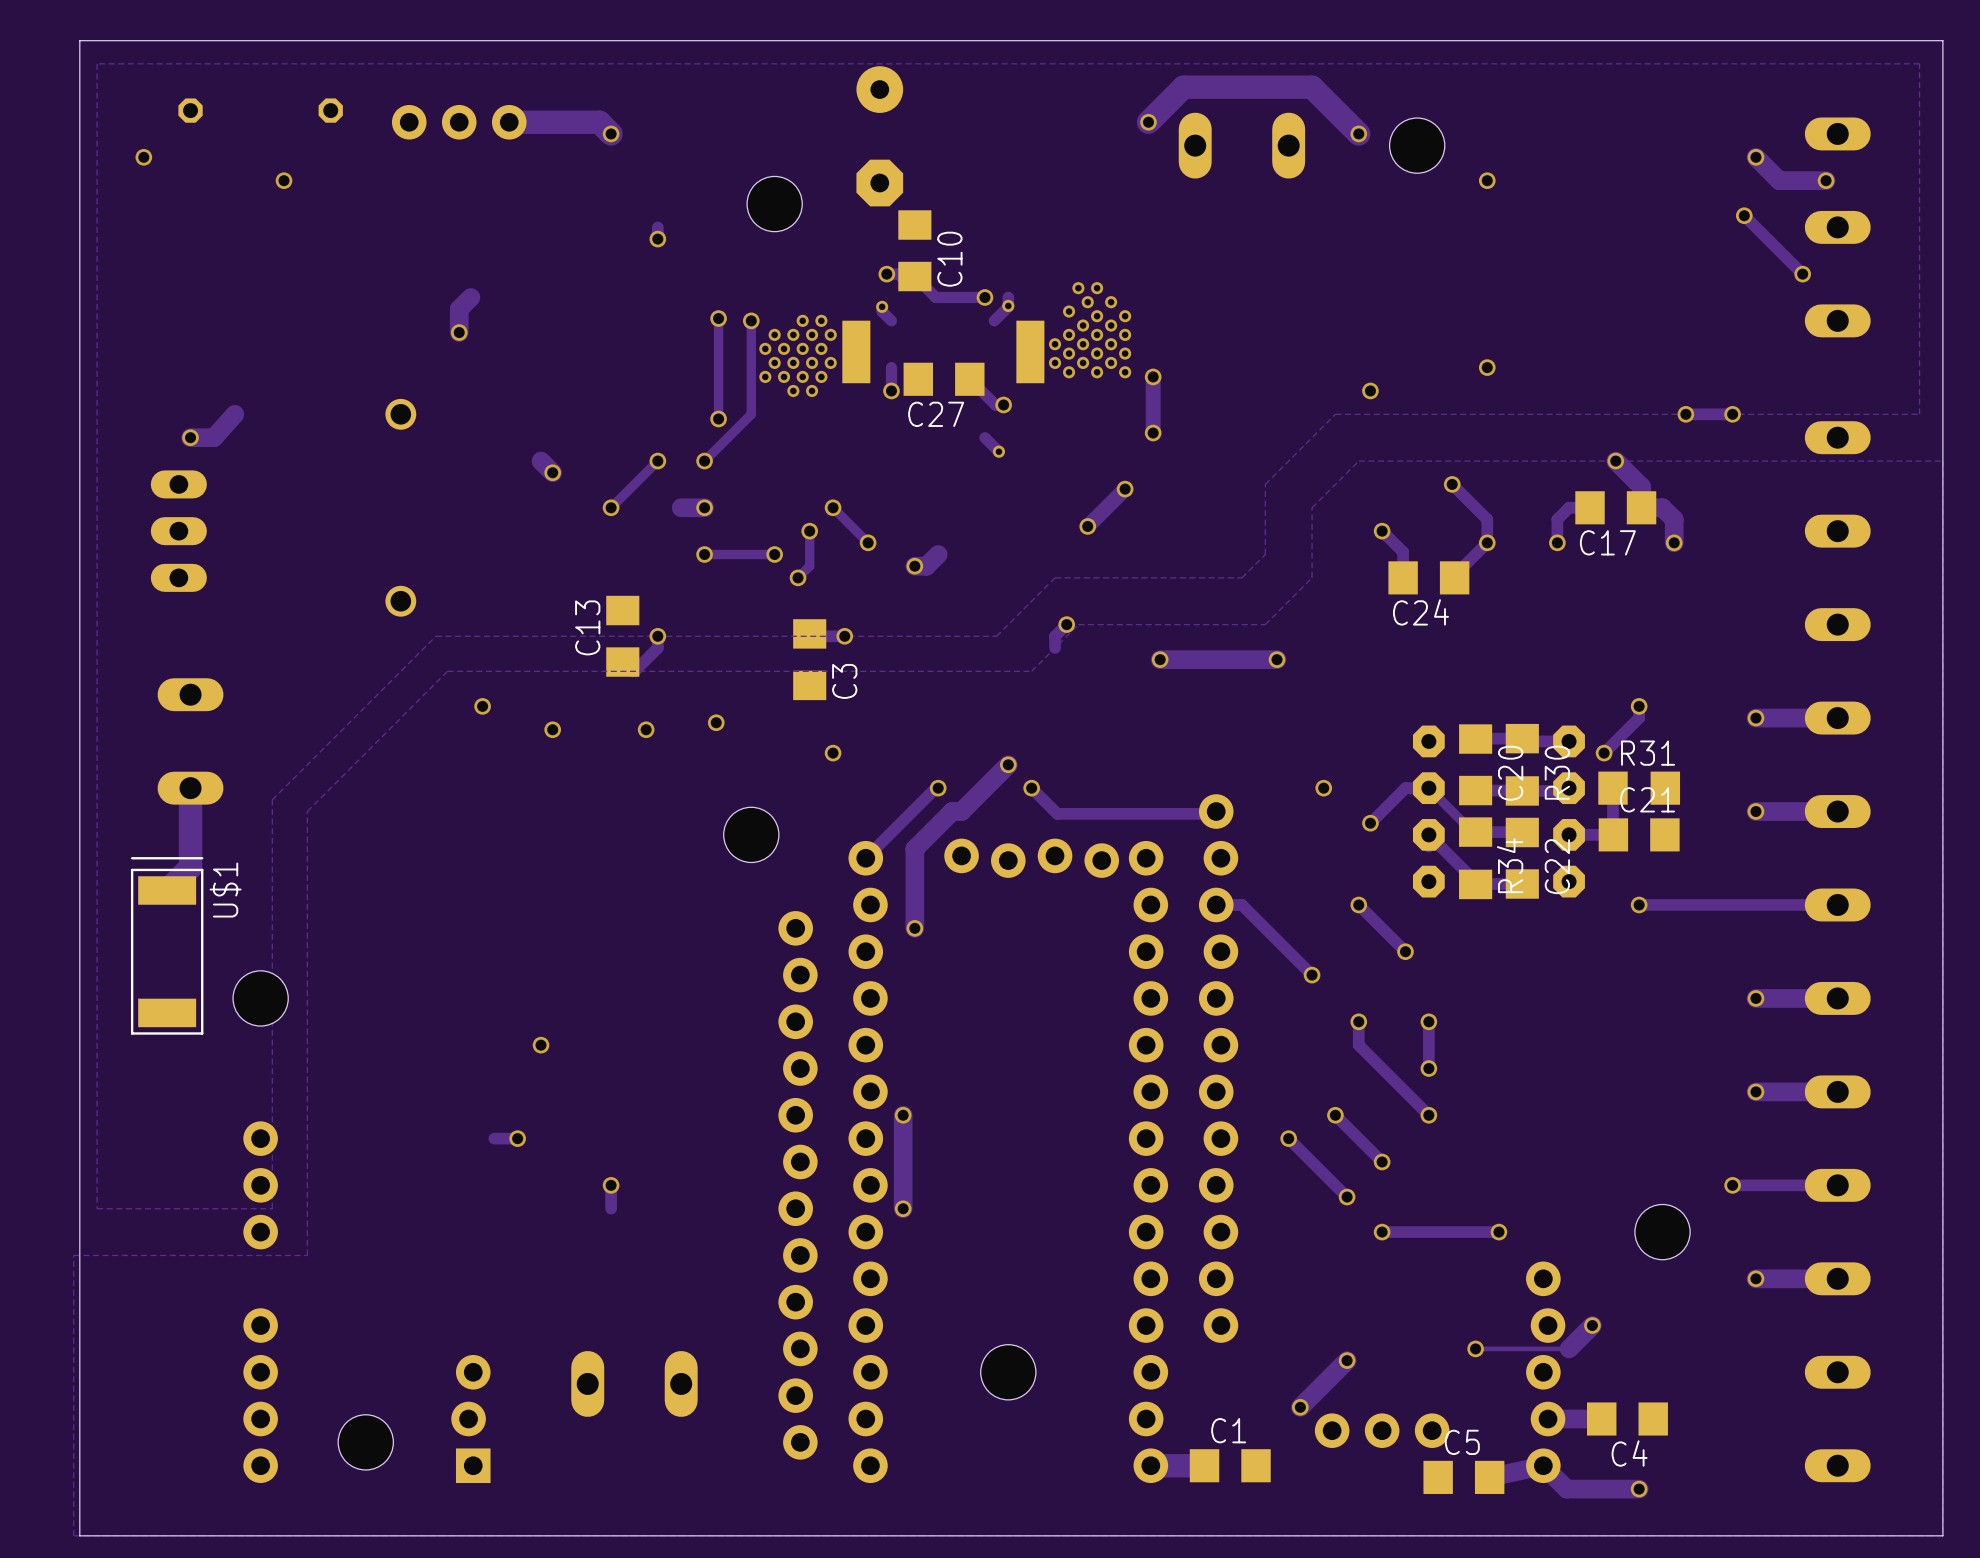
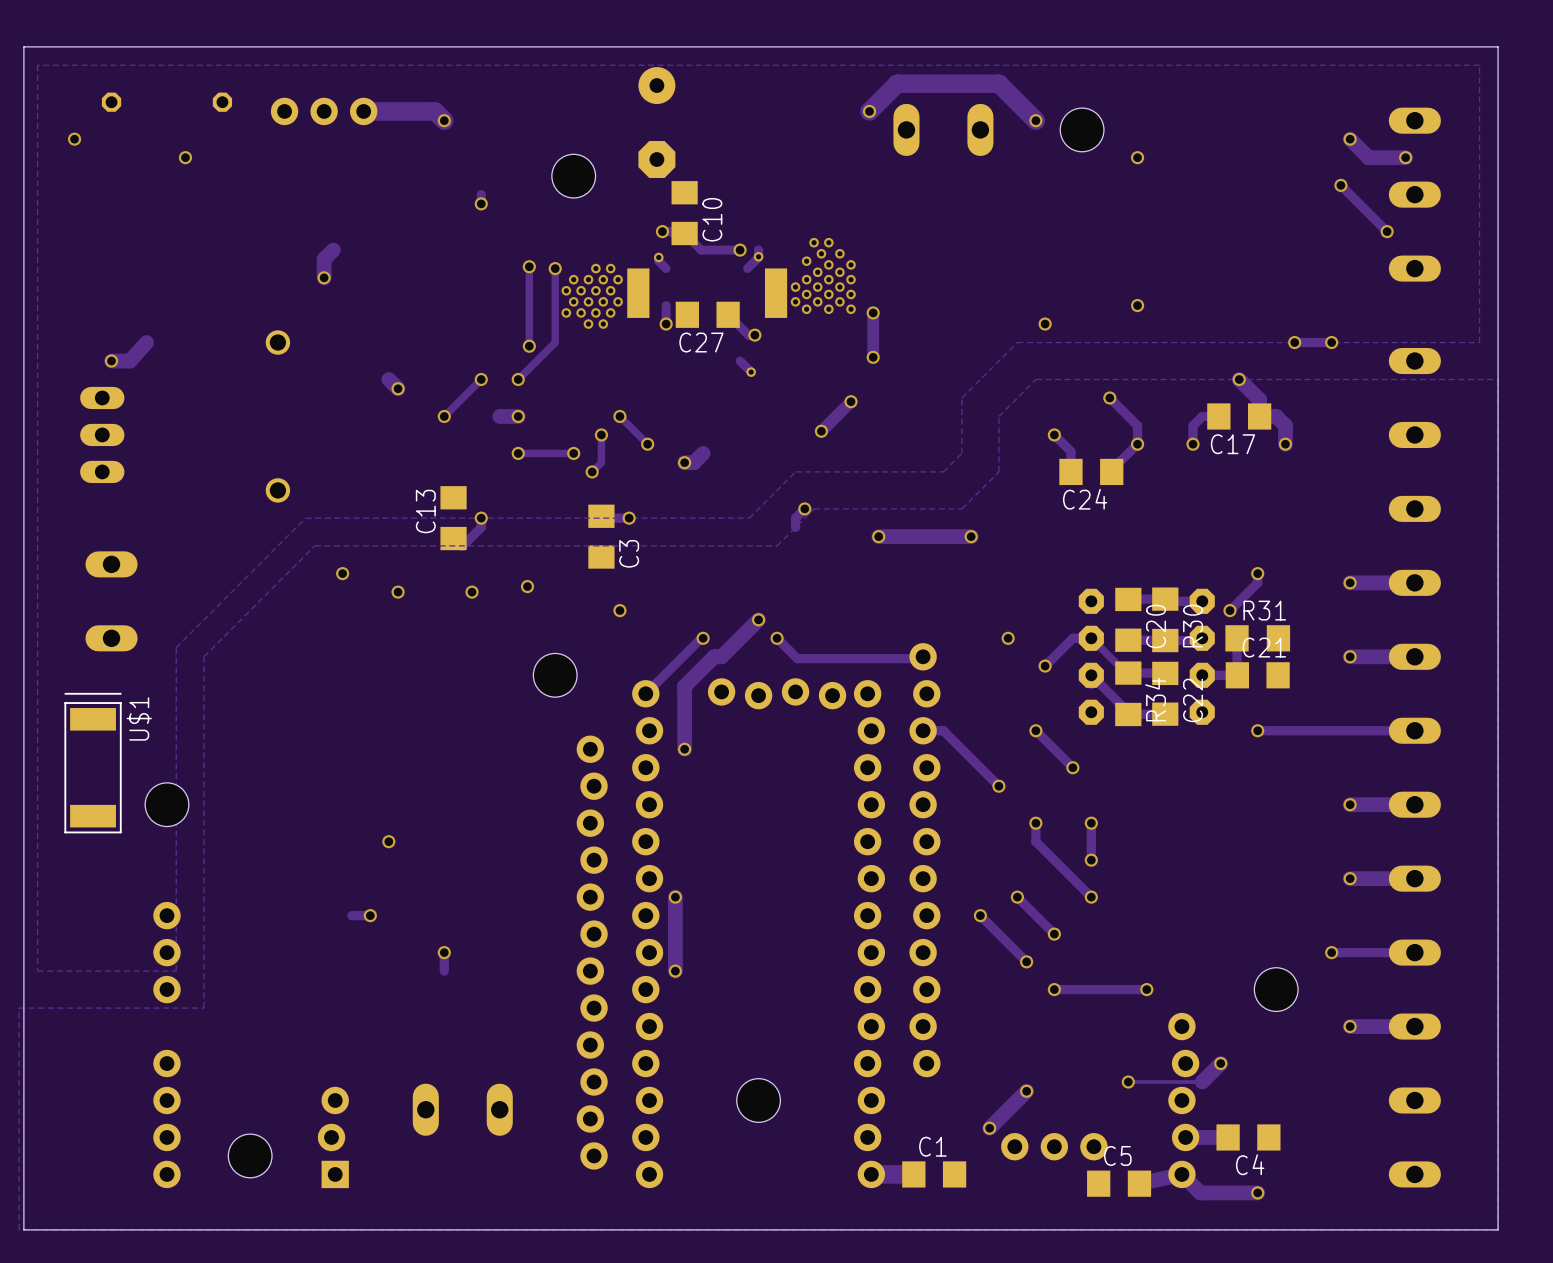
track: (190, 788) (190, 867) (167, 890) -> none

